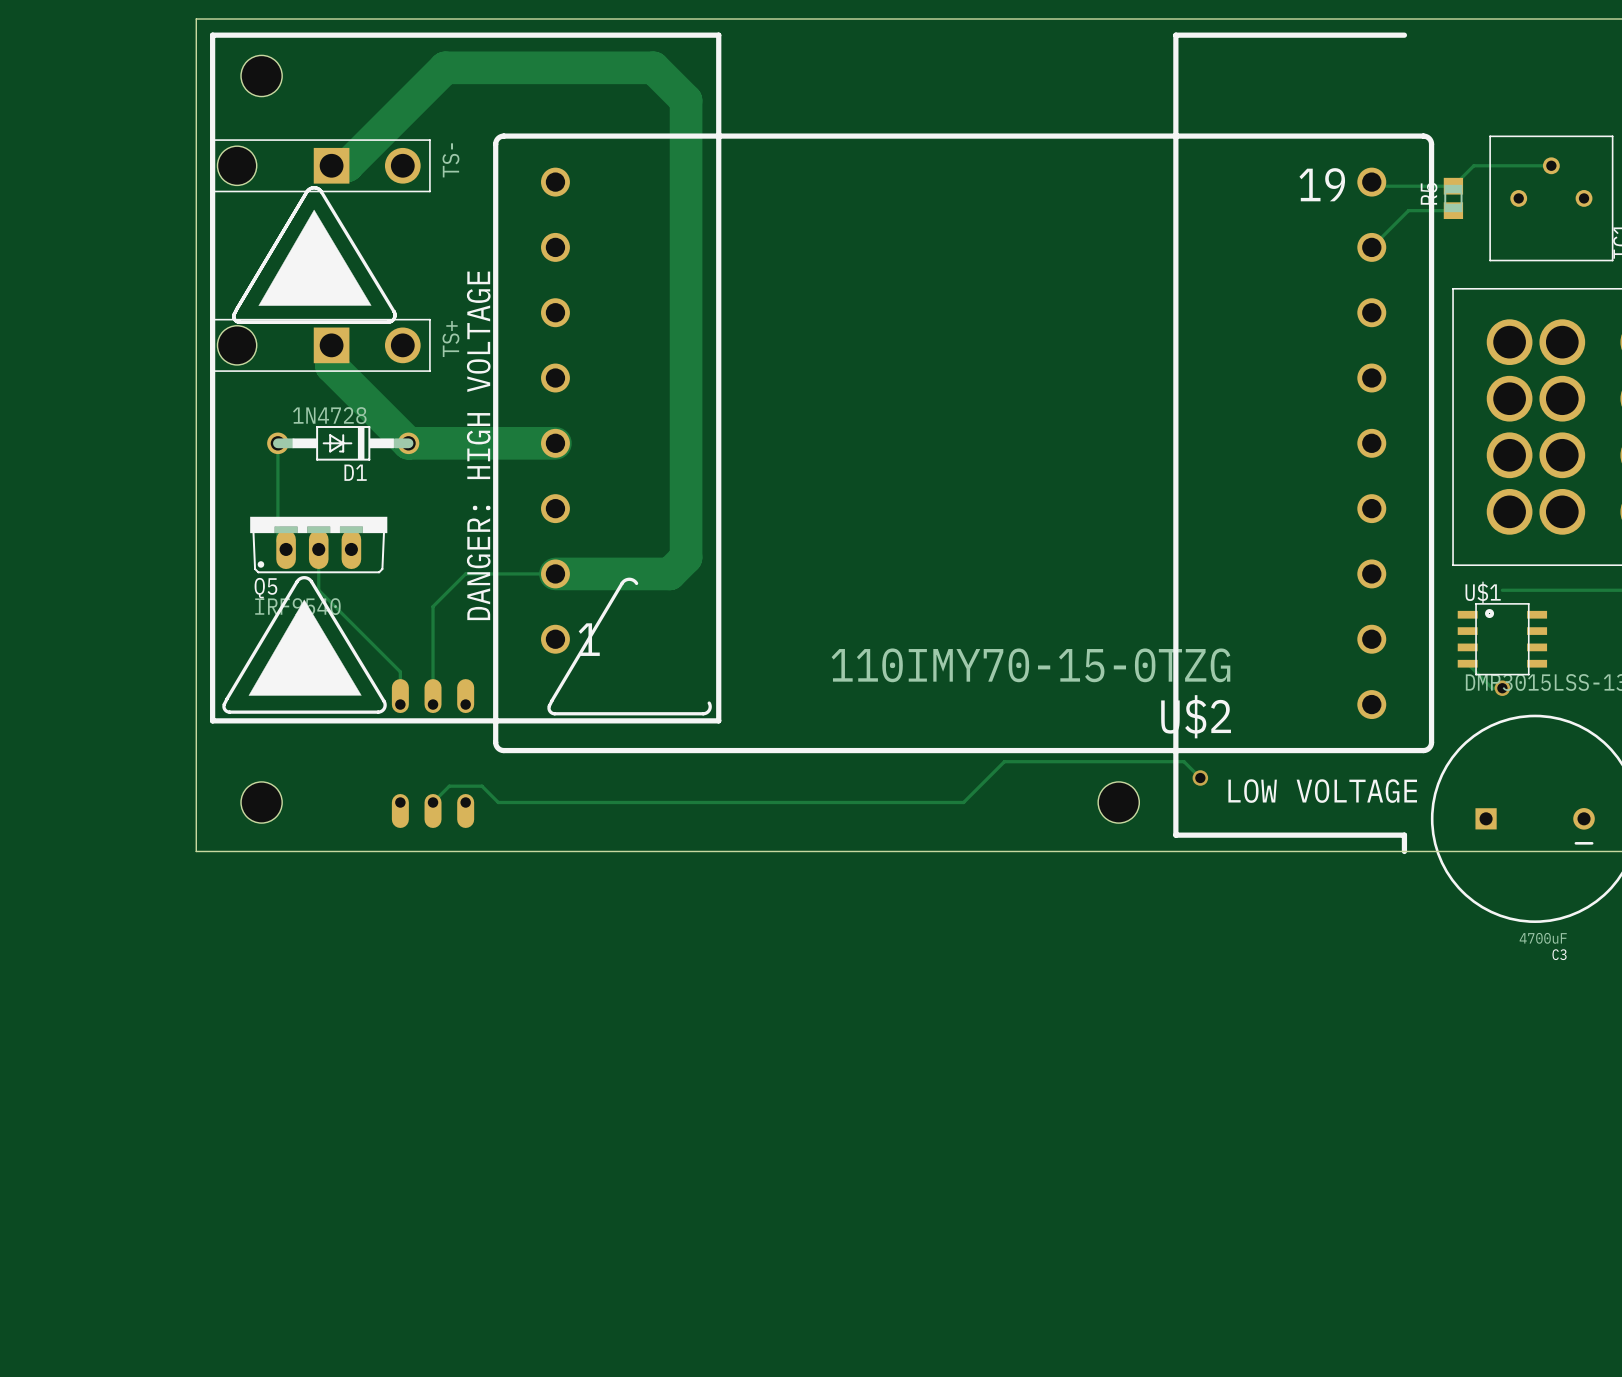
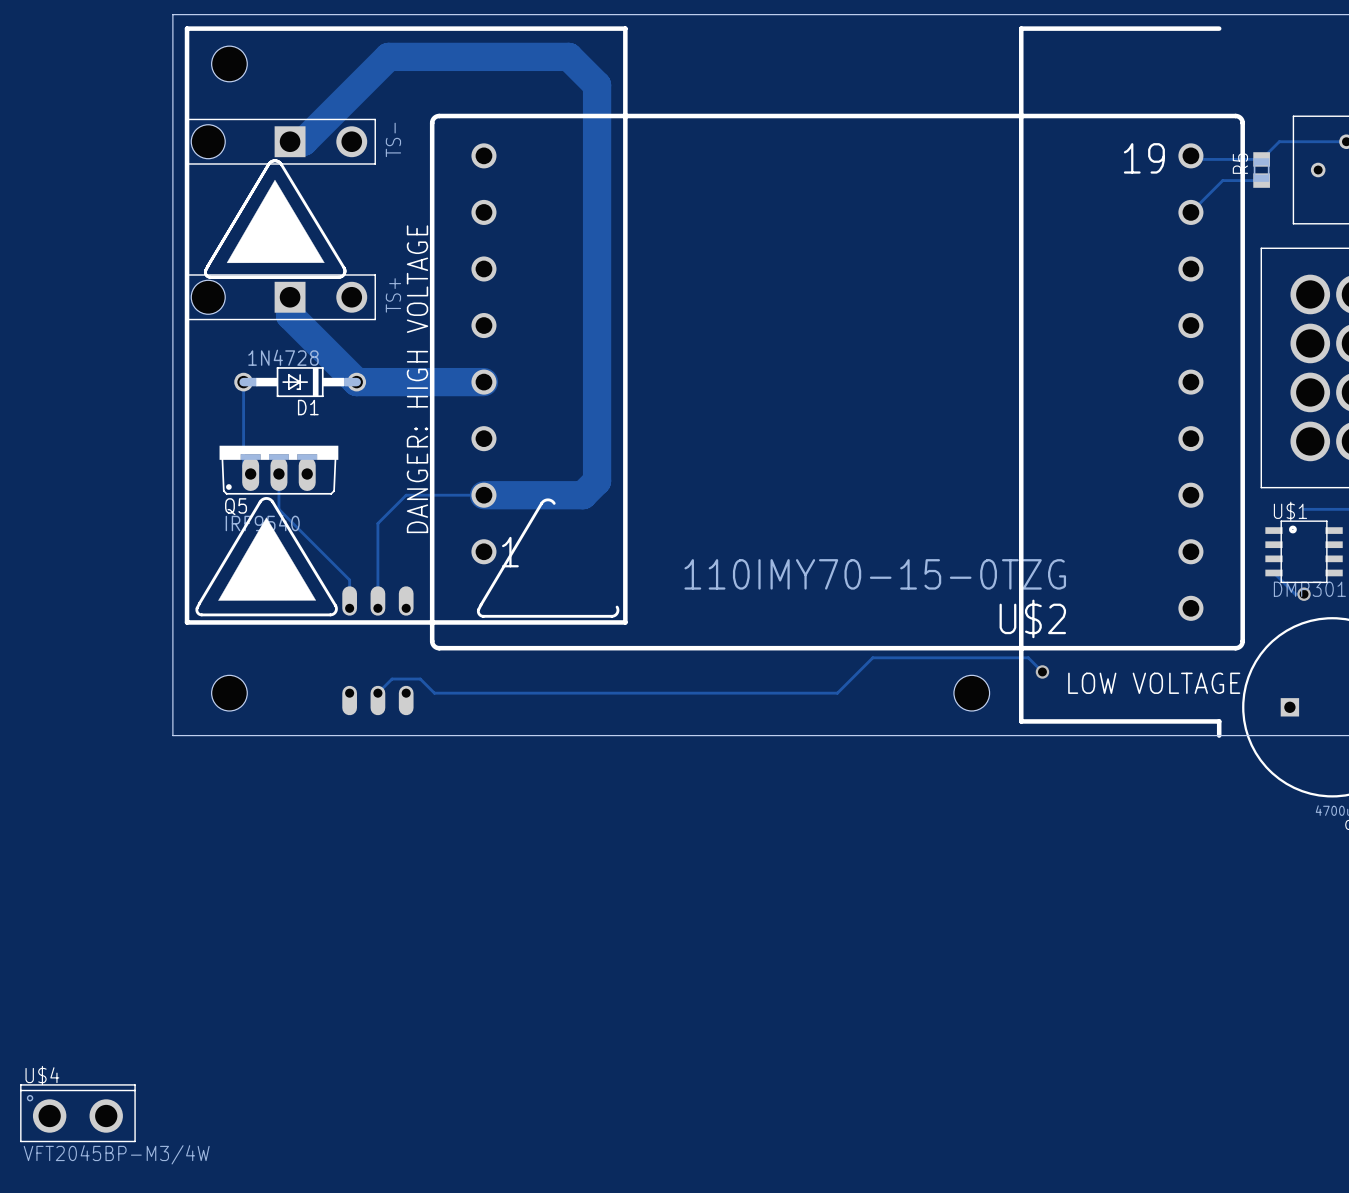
U$4: none -> VFT2045BP-M3/4W (77, 1113)

